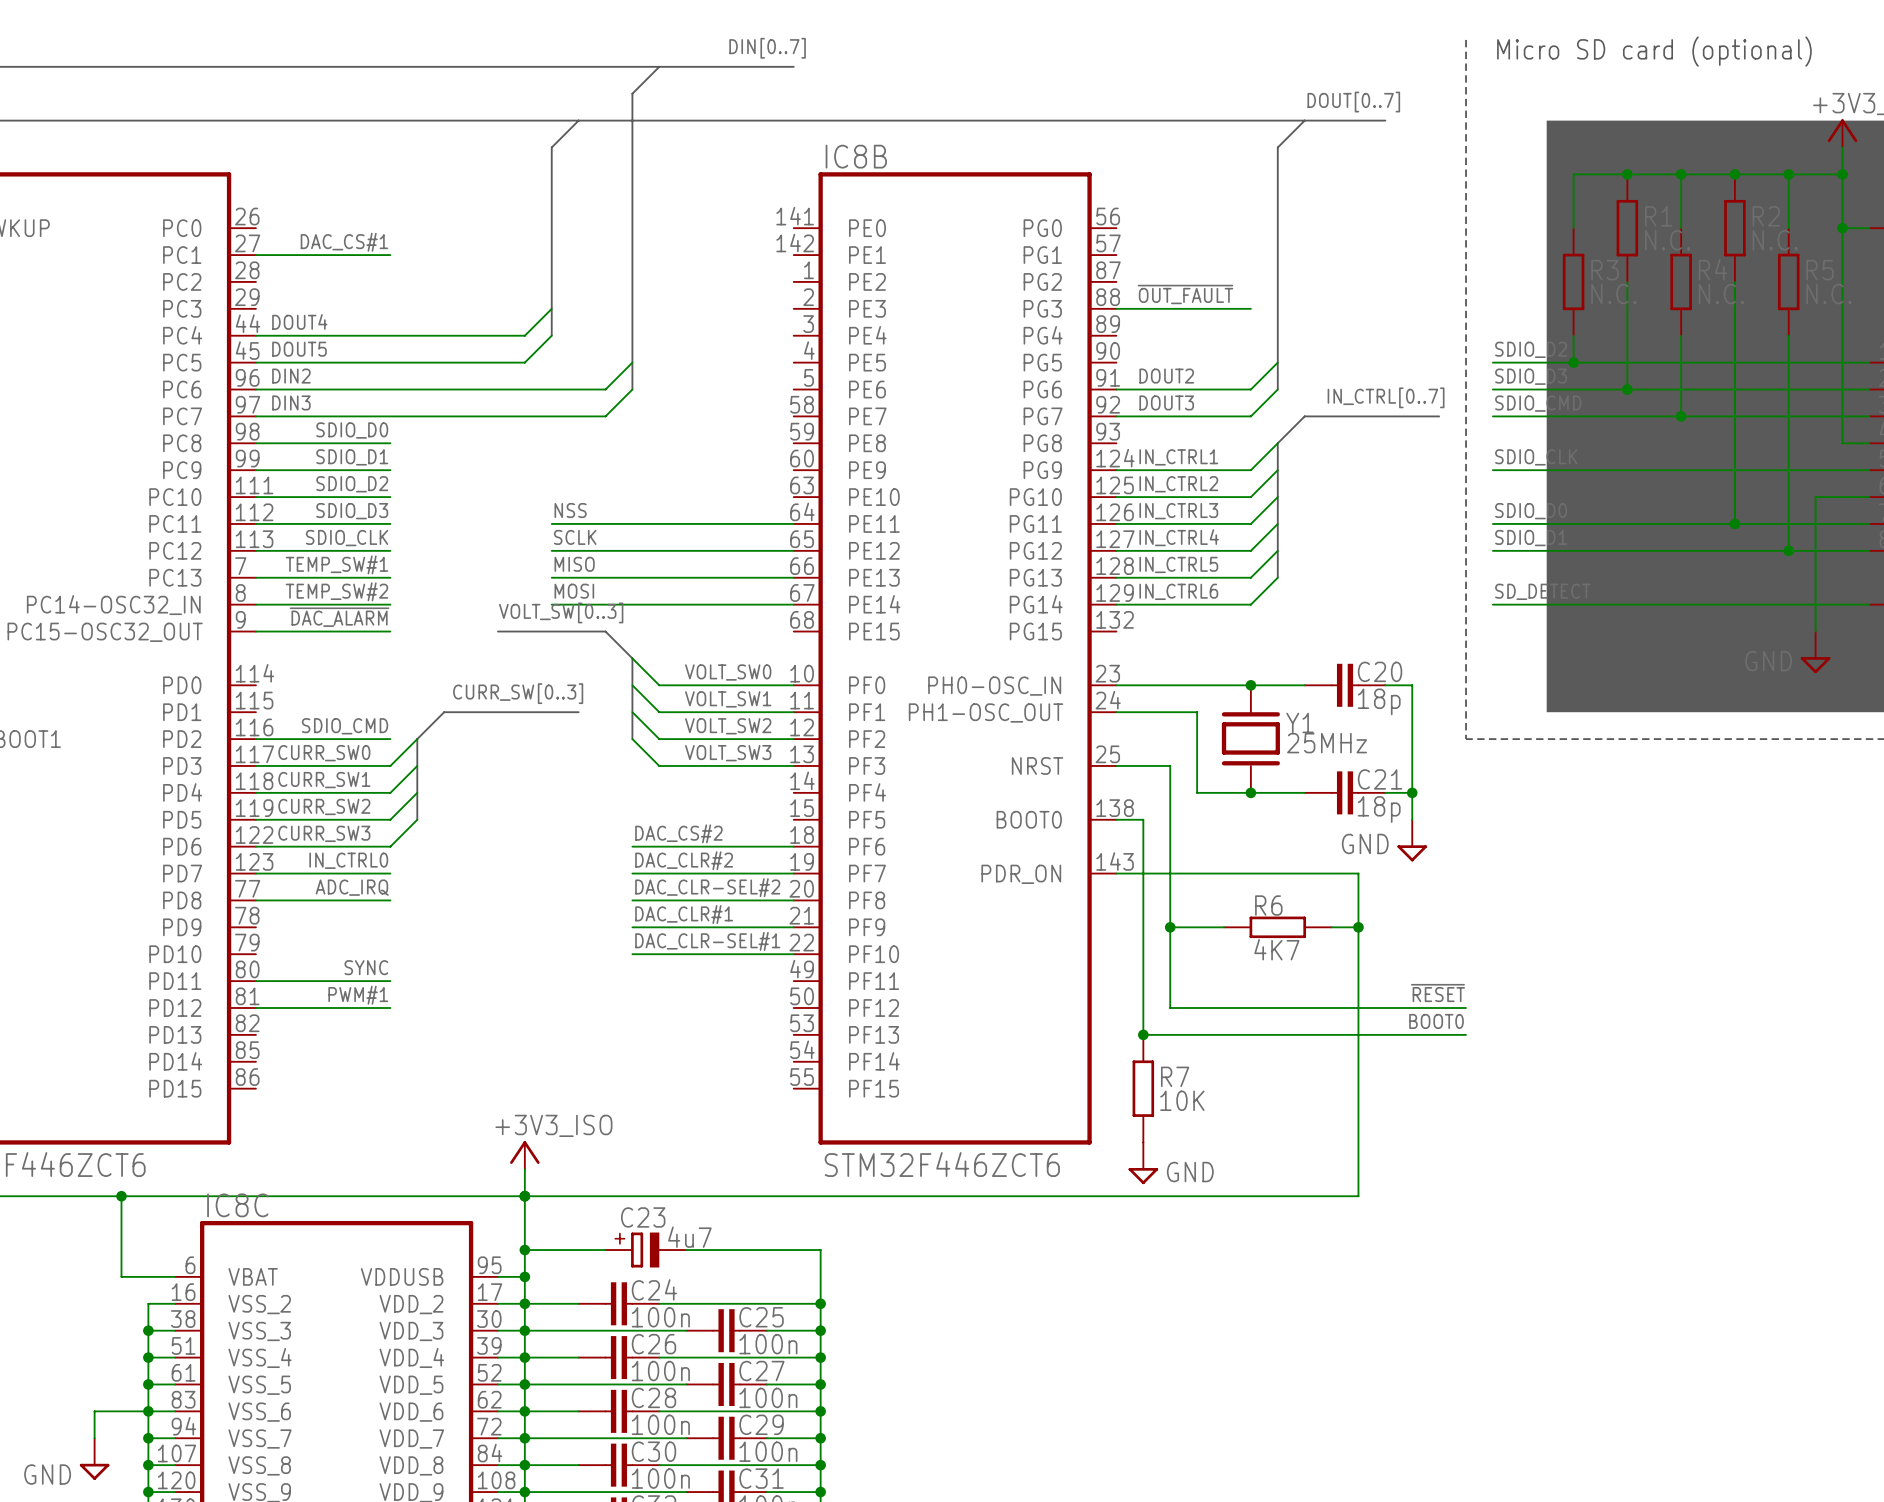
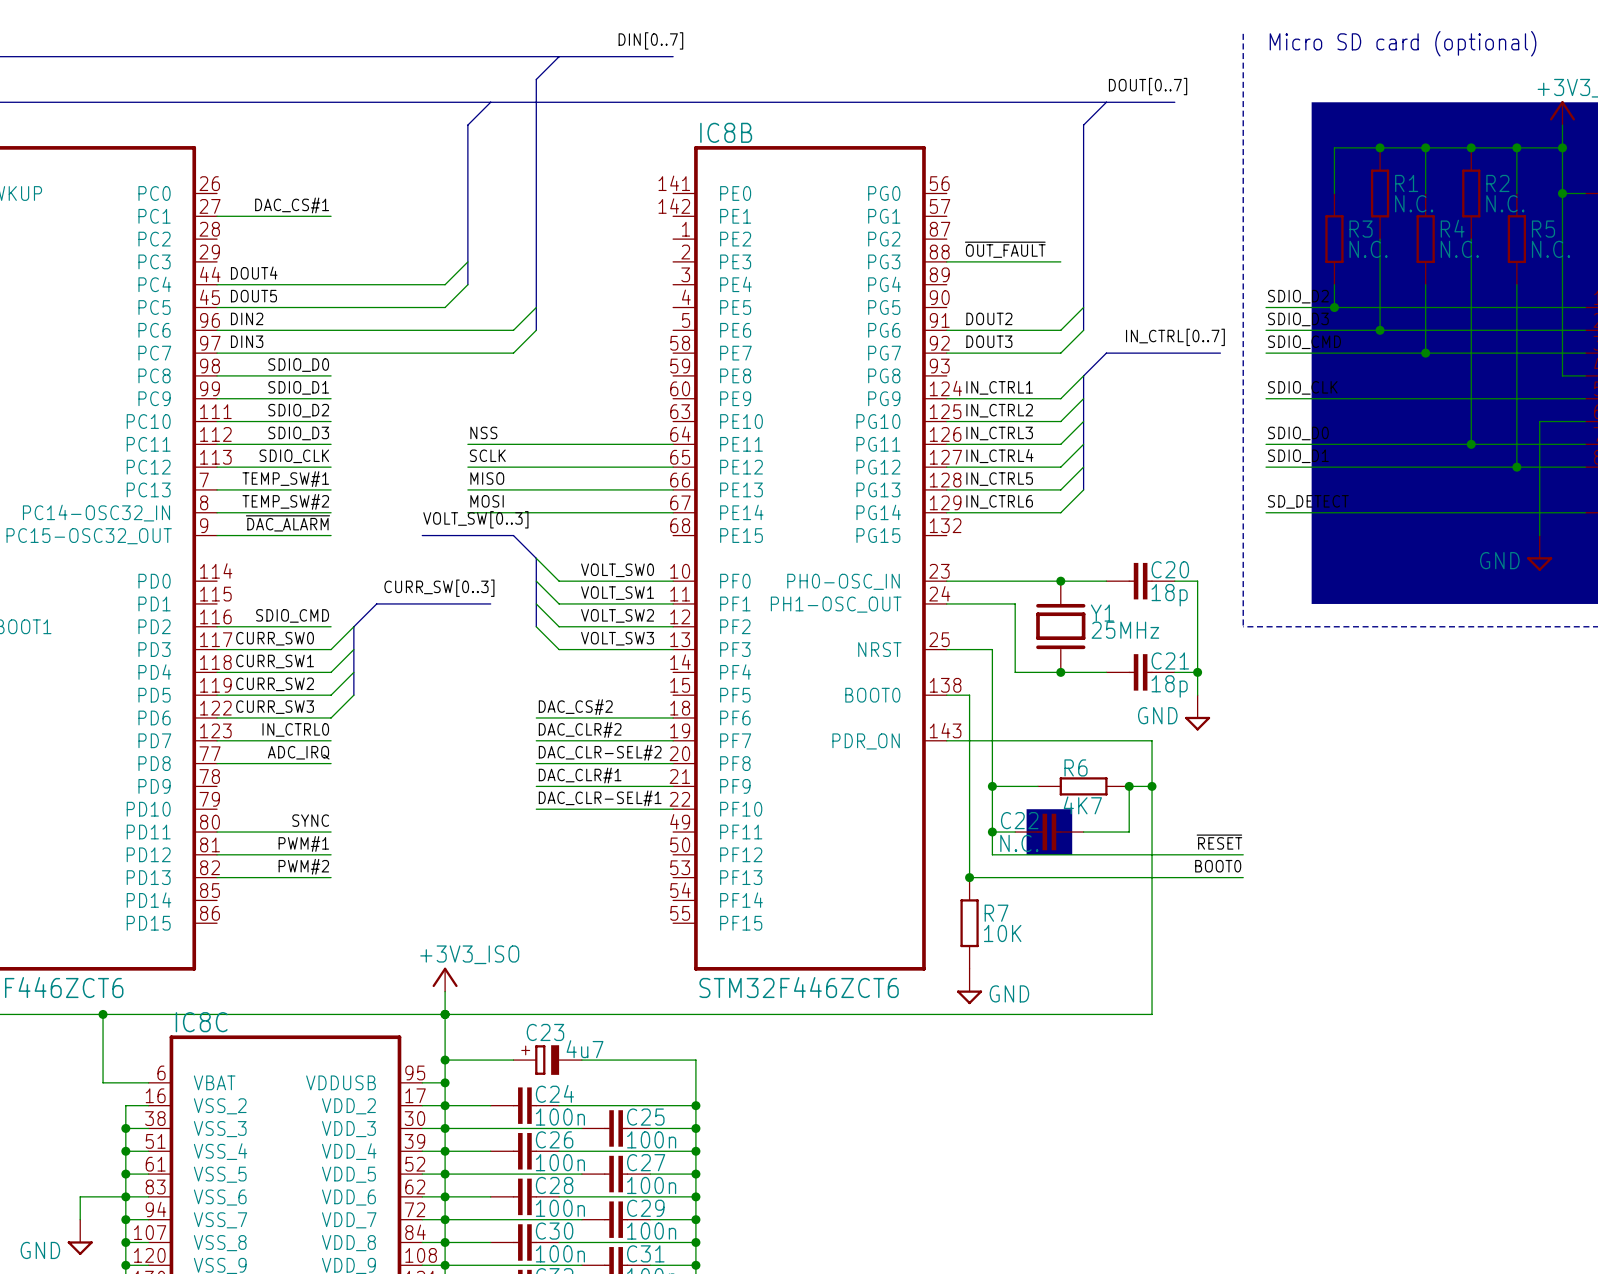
wire: none -> (1129, 786) (1129, 832) (1083, 832)
junction: none -> (1129, 786)
drawing: none -> [1026, 809, 1073, 855]
wire: none -> (992, 832) (1015, 832)
junction: none -> (992, 832)
C22: none -> N.C. (1049, 832)
label: none -> PWM#2 (303, 866)
wire: none -> (217, 877) (331, 877)

